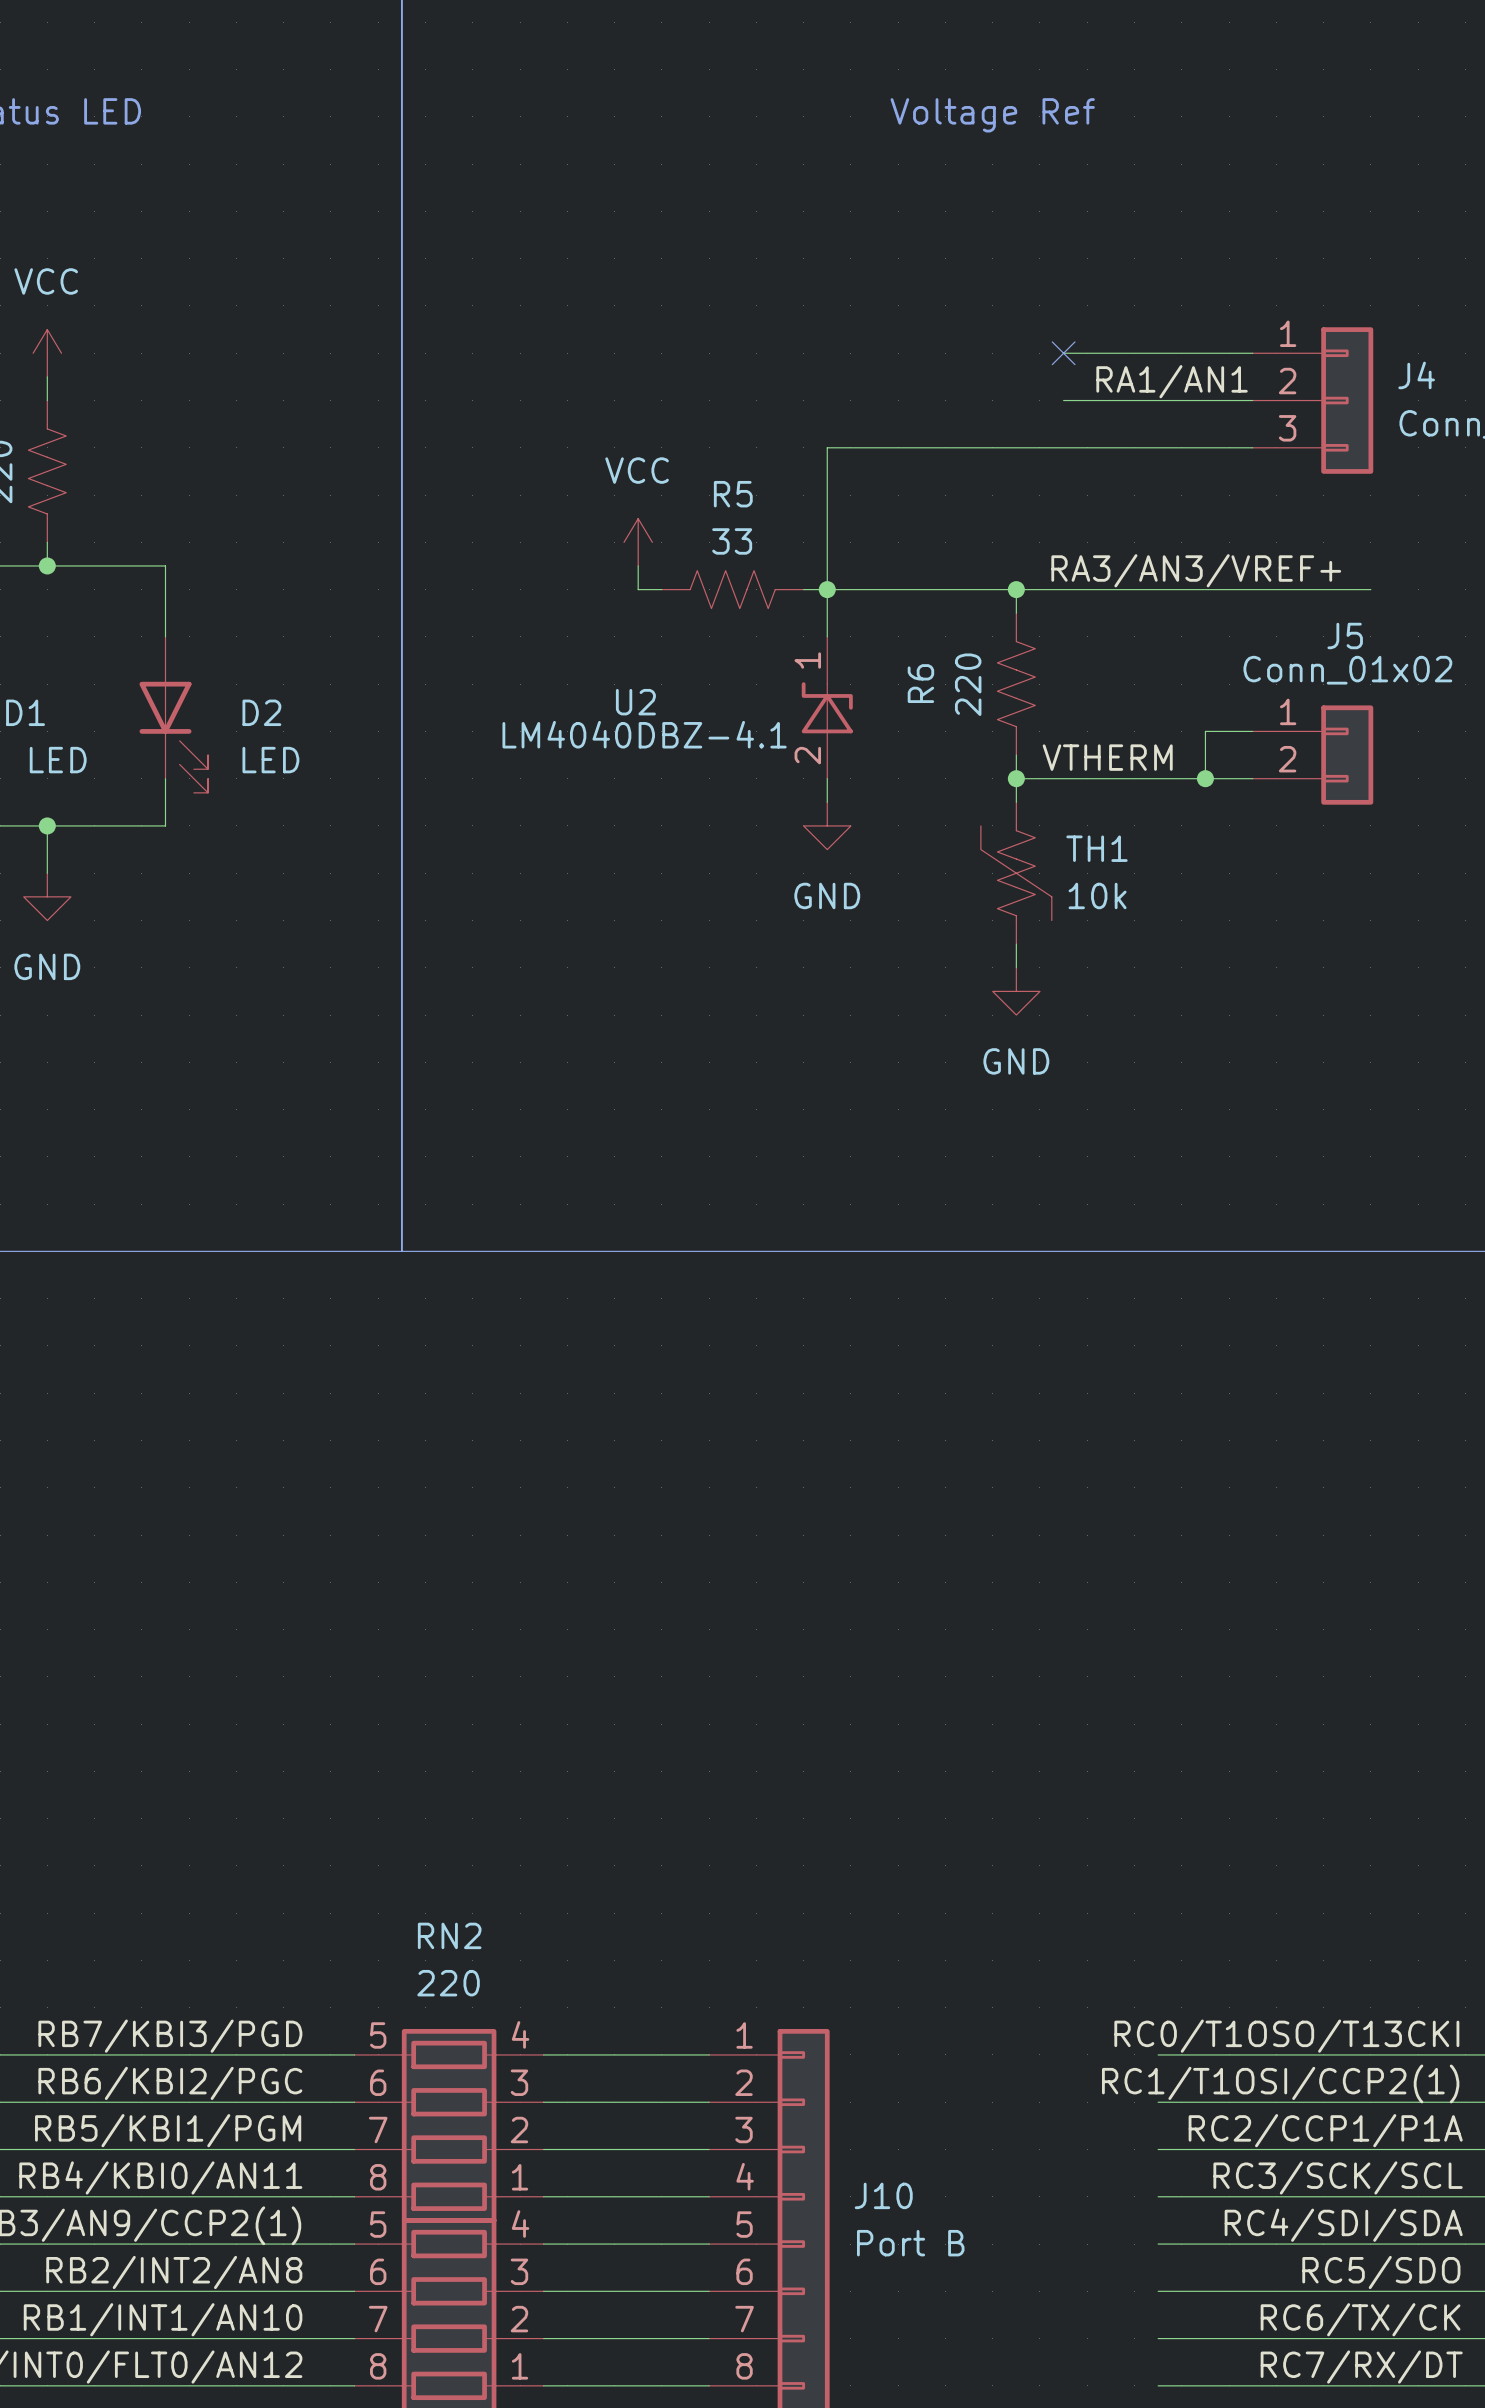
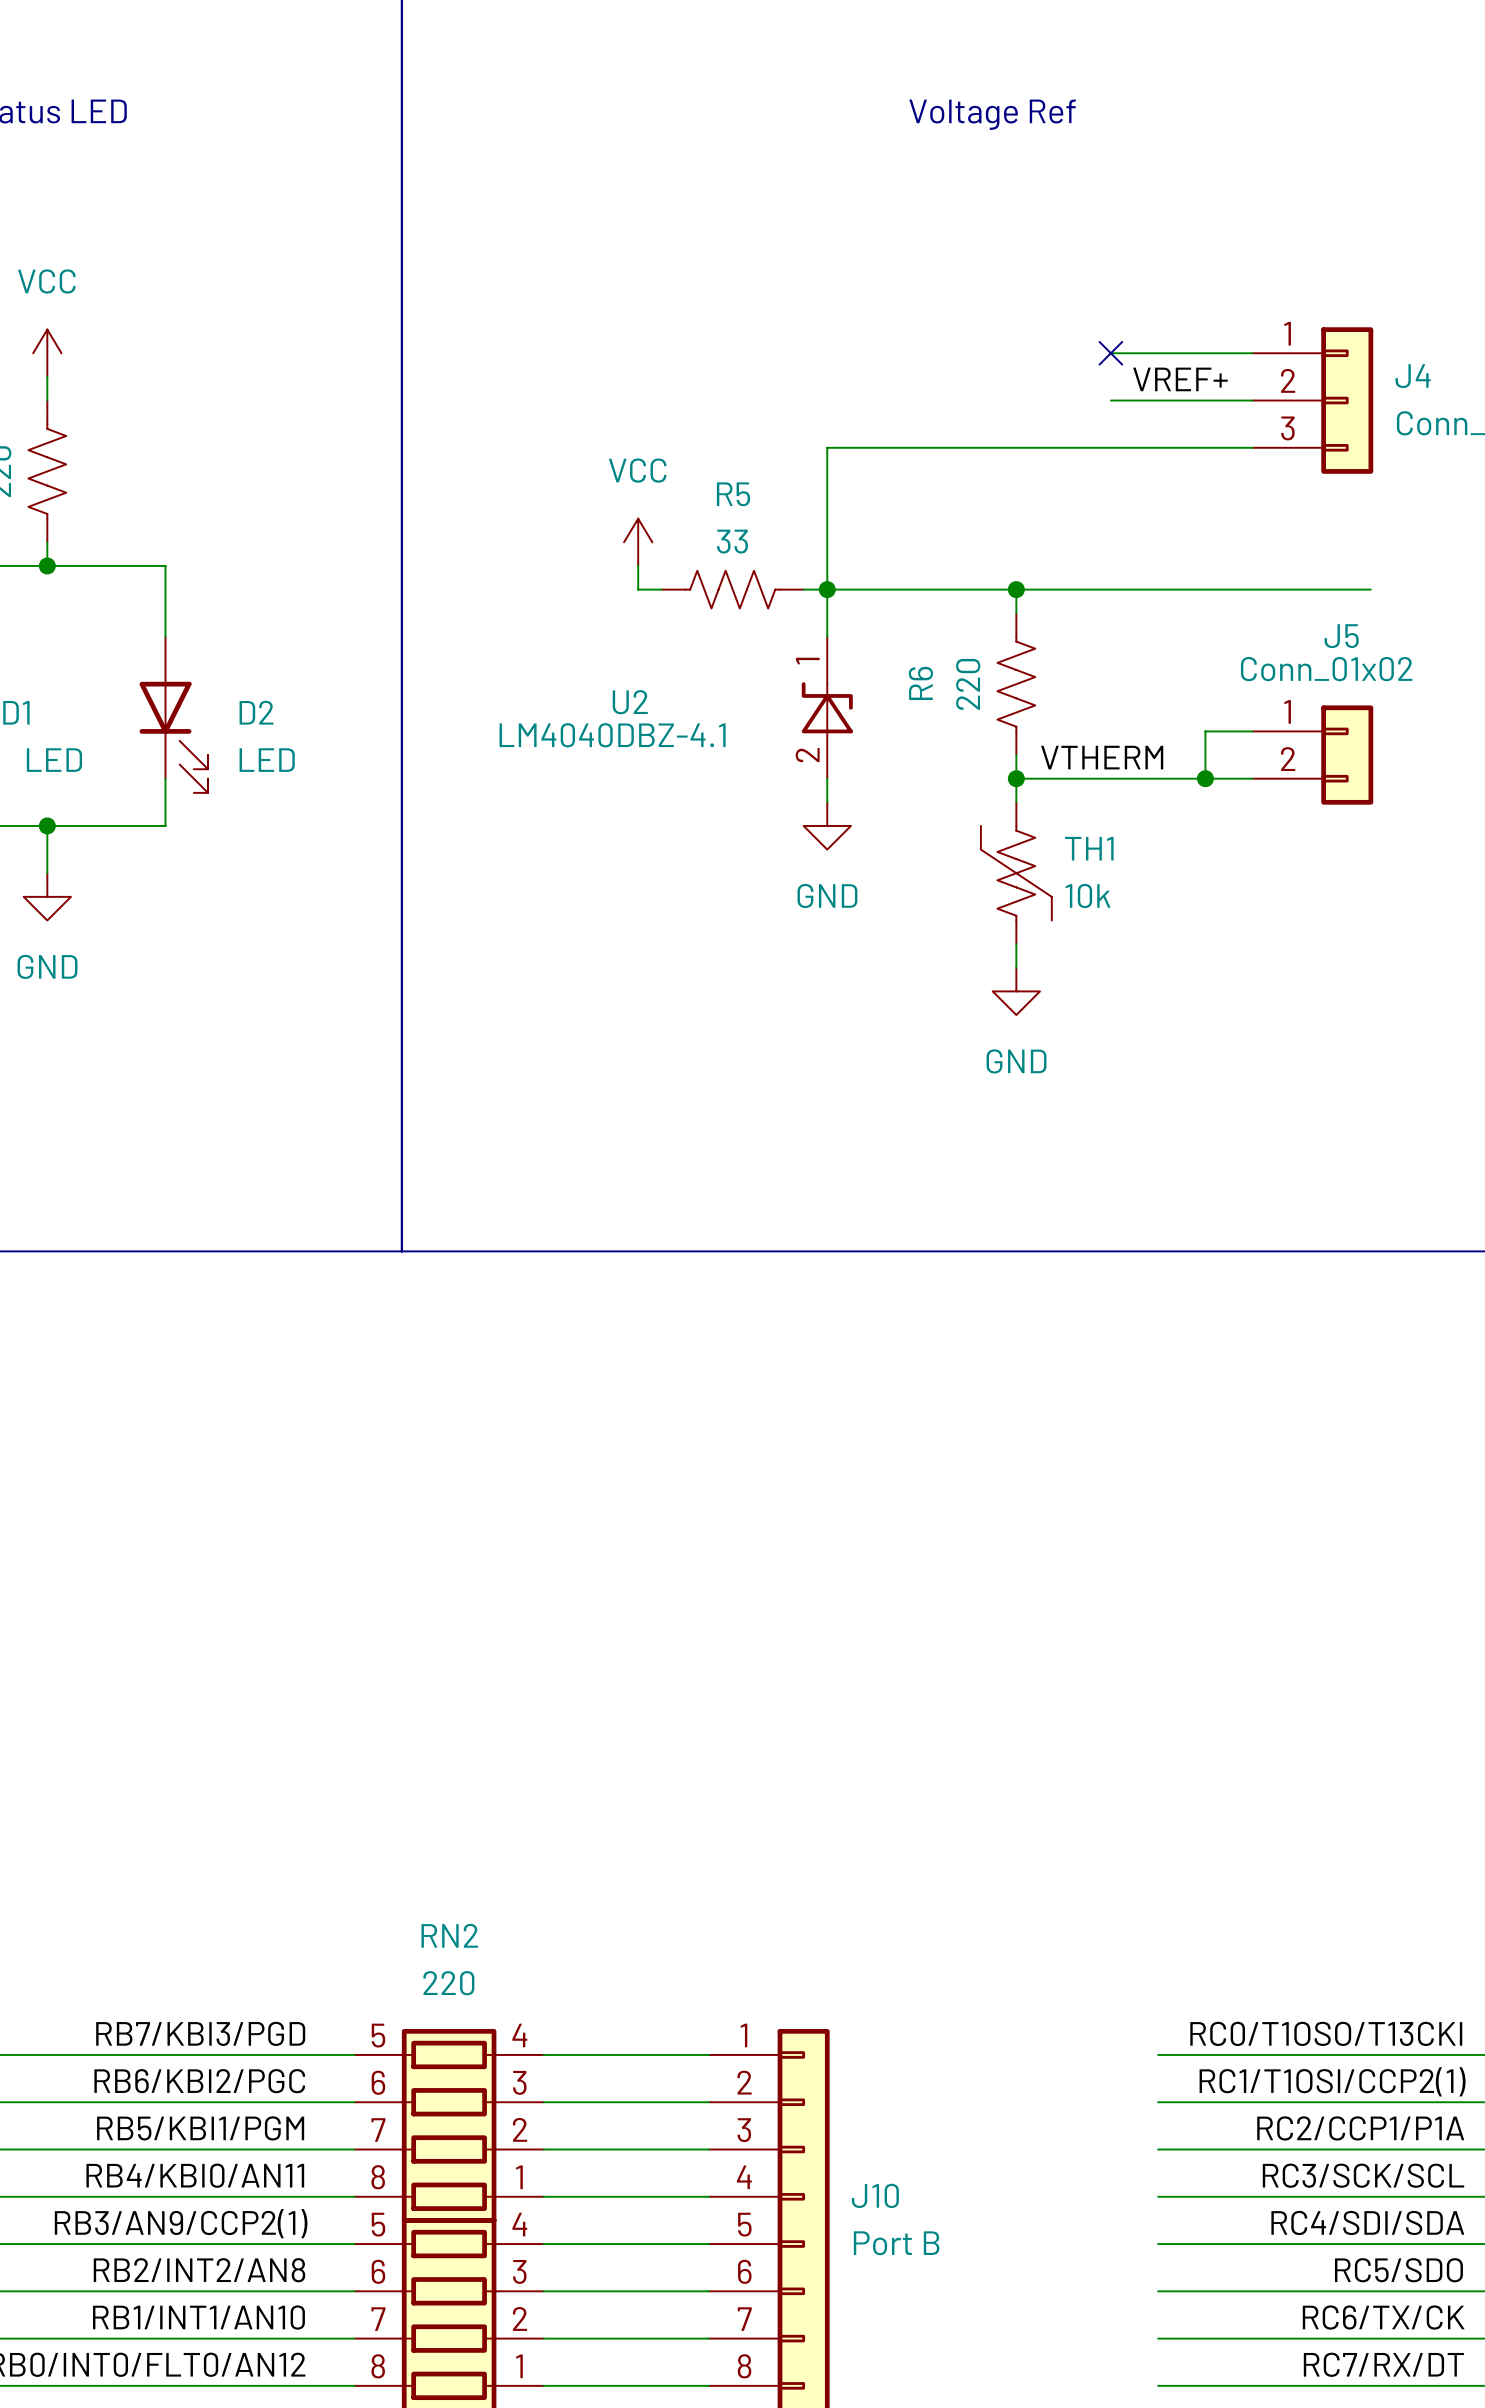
wire: (1063, 353) (1110, 353) -> none
no-connect mark position: (1063, 353) -> (1110, 353)
label: none -> VREF+ (1180, 379)
label: RA1/AN1 (1172, 381) -> none
wire: (1063, 400) (1110, 400) -> none
label: RA3/AN3/VREF+ (1196, 570) -> none

